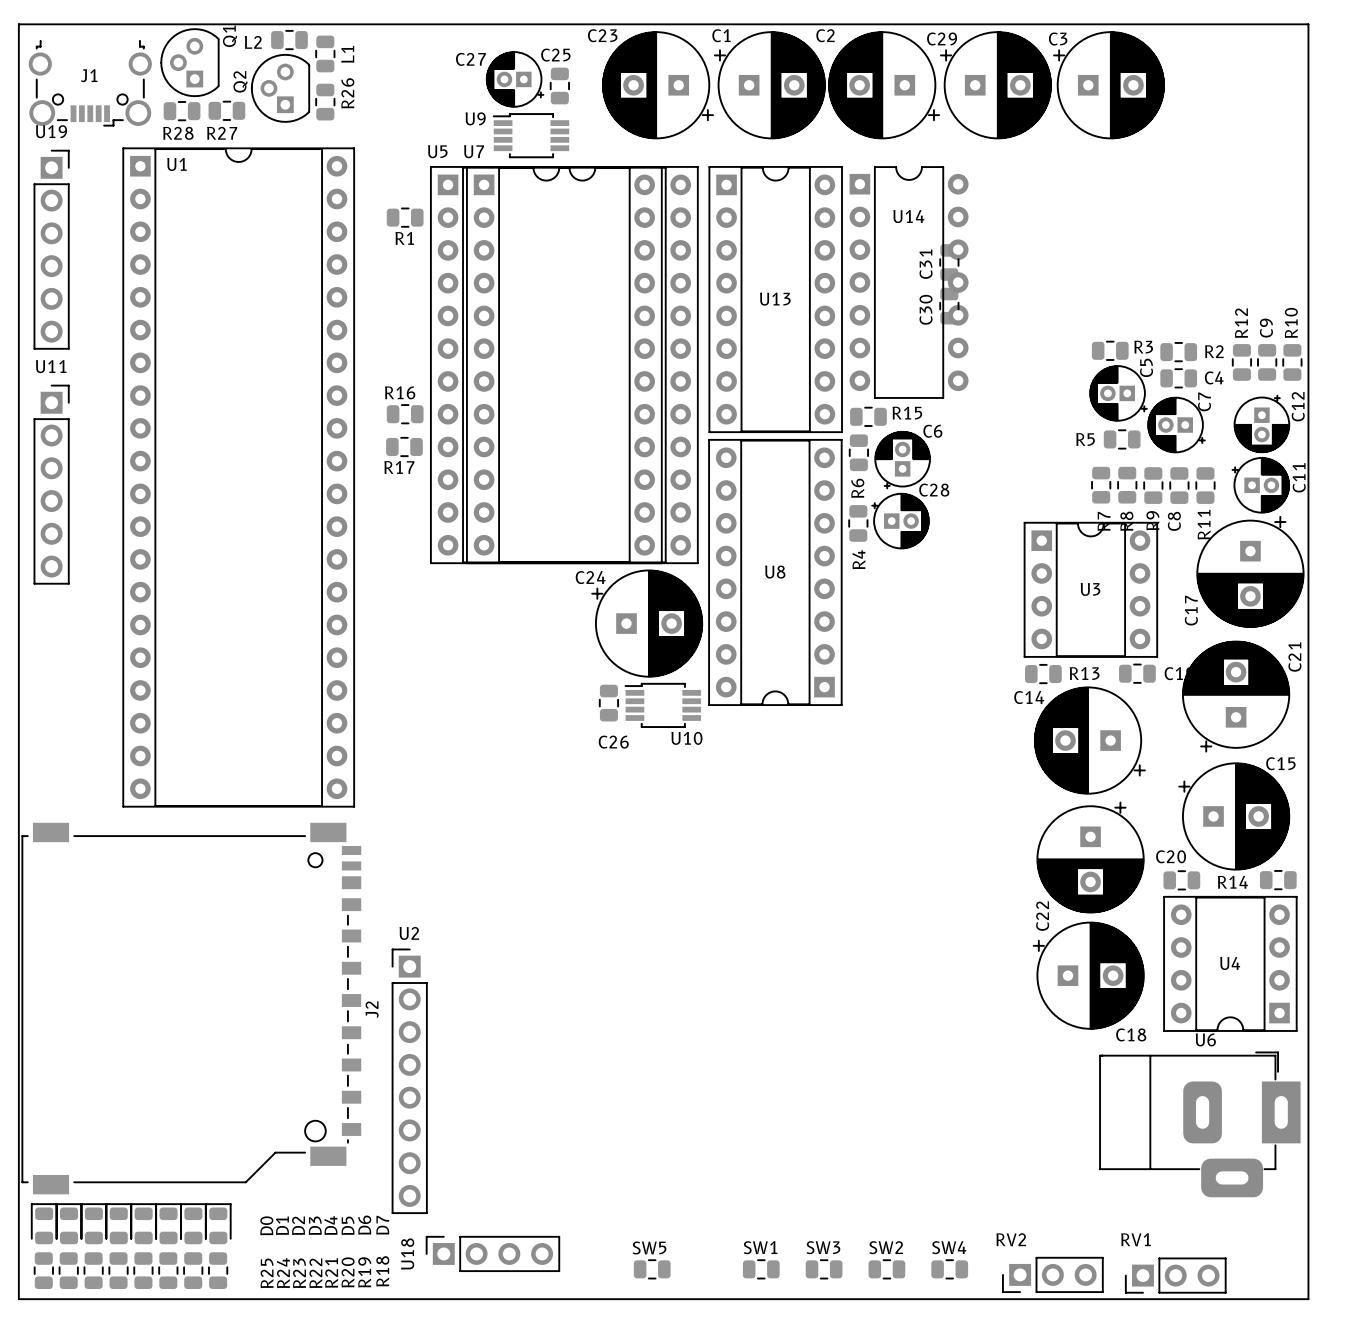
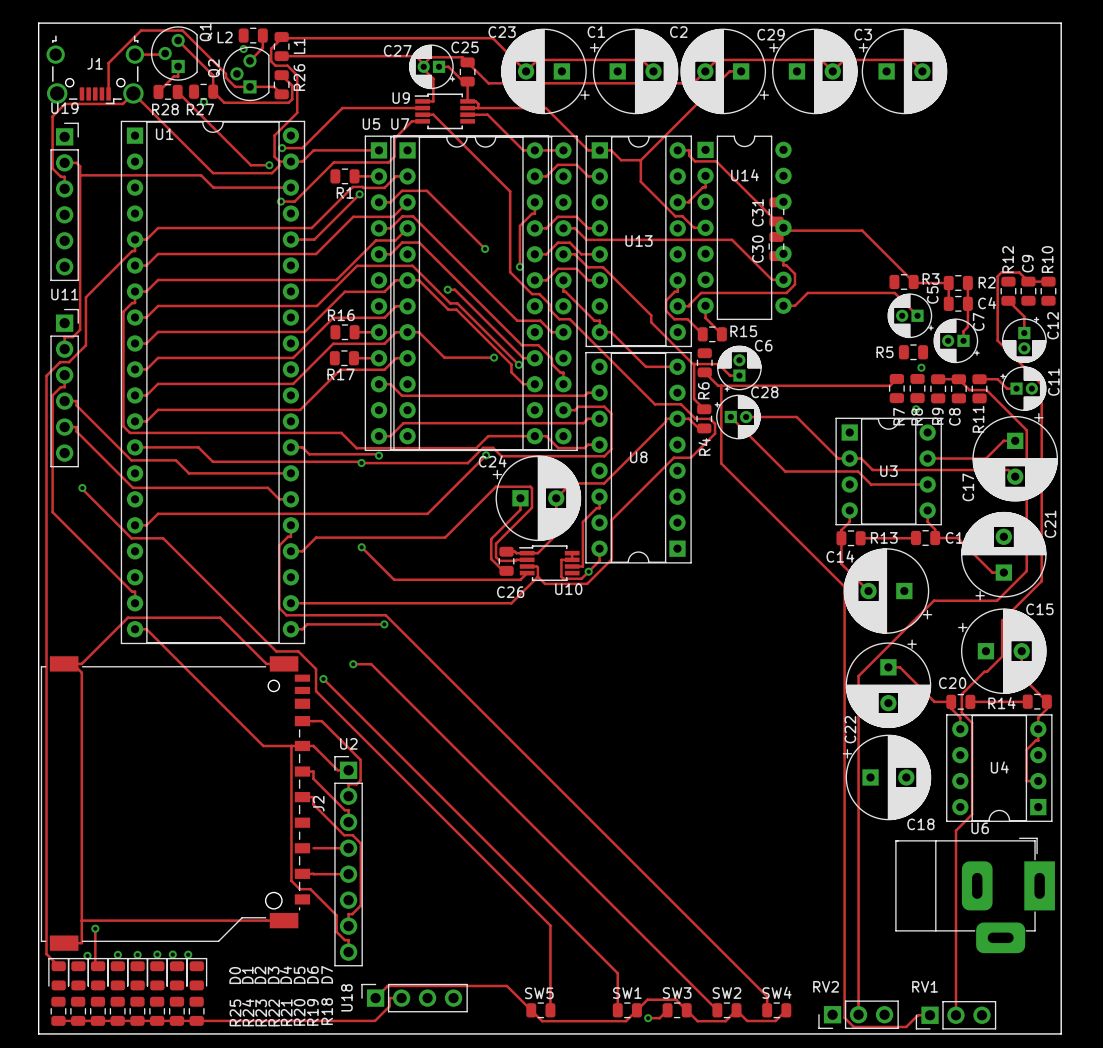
track: none -> (262, 35) (262, 48) (249, 60)
track: none -> (281, 38) (492, 38) (526, 71) (537, 59) (641, 59) (653, 71)
track: none -> (281, 38) (271, 48) (271, 61) (275, 65) (287, 65) (297, 75) (297, 112) (274, 135) (274, 156) (279, 161)
track: none -> (178, 40) (213, 75) (213, 91) (224, 102) (288, 102) (292, 99) (292, 85) (281, 75)
via: none -> (243, 49)
track: none -> (165, 53) (134, 54)
track: none -> (281, 56) (415, 56) (423, 64)
track: none -> (423, 64) (430, 57) (462, 57) (488, 83) (693, 83) (716, 59) (821, 59) (832, 71) (844, 59) (910, 59) (922, 71)
track: none -> (423, 64) (423, 69) (433, 78) (433, 101) (422, 101)
track: none -> (178, 66) (178, 76) (173, 76) (158, 91)
track: none -> (439, 66) (448, 66) (463, 81) (467, 81) (468, 101)
track: none -> (741, 71) (729, 71) (640, 160)
track: none -> (177, 91) (250, 165) (269, 165)
track: none -> (108, 93) (108, 63) (141, 30) (182, 30) (226, 73) (226, 77) (235, 86) (274, 86) (281, 94)
via: none -> (203, 101)
track: none -> (467, 101) (475, 101) (478, 108)
track: none -> (422, 108) (342, 108) (302, 148) (282, 148)
track: none -> (467, 108) (545, 108) (588, 150) (611, 150) (621, 160) (640, 160)
track: none -> (422, 114) (433, 114) (510, 191) (510, 272) (532, 294) (539, 294) (550, 305) (550, 310) (559, 319) (569, 319) (654, 404) (681, 404) (695, 418) (710, 418) (715, 423) (715, 433) (690, 457) (673, 457) (611, 519) (611, 559) (587, 583) (544, 583) (537, 576)
track: none -> (467, 114) (487, 114) (523, 150) (563, 150)
track: none -> (422, 121) (411, 121) (394, 138) (394, 156) (388, 162) (333, 162) (294, 201) (281, 201)
via: none -> (282, 148)
track: none -> (378, 150) (313, 150) (302, 161) (279, 161)
track: none -> (677, 150) (689, 150) (689, 155) (695, 161) (716, 161) (782, 227)
track: none -> (640, 160) (640, 181) (675, 216) (682, 216) (694, 227) (705, 227)
track: none -> (279, 161) (279, 165) (271, 173) (213, 173) (133, 93) (122, 103) (65, 103) (52, 116) (52, 168) (60, 176) (64, 176) (64, 188)
track: none -> (64, 162) (76, 162) (80, 166) (80, 329) (72, 337) (64, 337) (64, 349)
via: none -> (269, 165)
track: none -> (80, 175) (201, 175) (213, 187) (290, 187)
track: none -> (705, 175) (705, 187) (702, 187) (689, 202) (677, 202)
track: none -> (354, 176) (378, 176)
track: none -> (407, 176) (396, 176) (384, 187) (352, 186) (311, 228) (158, 228) (146, 239) (135, 239) (135, 251) (132, 251) (85, 297) (85, 345) (69, 362) (60, 362) (46, 375) (46, 954) (58, 966)
track: none -> (534, 176) (546, 176) (557, 164) (576, 164) (588, 176) (599, 176)
track: none -> (359, 194) (314, 239) (290, 239)
via: none -> (359, 194)
via: none -> (281, 201)
track: none -> (378, 202) (390, 202) (402, 190) (426, 190) (485, 248)
track: none -> (407, 202) (393, 216) (353, 216) (316, 254) (158, 254) (146, 265) (135, 265)
track: none -> (534, 202) (534, 213) (531, 213) (519, 225) (519, 266)
track: none -> (378, 228) (390, 228) (402, 216) (413, 216) (517, 320) (540, 320) (551, 332) (563, 332)
track: none -> (407, 228) (395, 240) (375, 240) (336, 280) (158, 280) (146, 291) (135, 291) (135, 303) (132, 303) (123, 311) (123, 426) (130, 432) (341, 432) (356, 448) (476, 448) (488, 436) (546, 436) (558, 448) (584, 448) (588, 444) (599, 444)
track: none -> (534, 228) (546, 228) (557, 216) (576, 216) (588, 228) (599, 228)
track: none -> (563, 228) (574, 228) (586, 239) (732, 239) (771, 279) (783, 279)
track: none -> (782, 230) (862, 230) (914, 283) (948, 283) (948, 303)
via: none -> (485, 248)
track: none -> (378, 254) (390, 254) (402, 242) (419, 242) (521, 345) (538, 345) (551, 358) (551, 364) (560, 372) (563, 372) (563, 384)
track: none -> (534, 254) (546, 254) (557, 242) (569, 242) (581, 254) (599, 254)
track: none -> (563, 254) (574, 254) (587, 267) (603, 267) (651, 315) (651, 322) (693, 364) (718, 364) (729, 375) (739, 375)
track: none -> (776, 256) (783, 253) (783, 265) (786, 265) (794, 273) (794, 284) (786, 292) (701, 292) (689, 306) (677, 306)
via: none -> (519, 266)
track: none -> (534, 280) (546, 280) (557, 268) (576, 268) (588, 280) (599, 280)
track: none -> (563, 280) (563, 291) (594, 320) (599, 320) (599, 332) (611, 332) (645, 366) (677, 366)
track: none -> (677, 280) (677, 291) (674, 291) (666, 300) (666, 310) (674, 319) (687, 319) (702, 334)
track: none -> (1048, 281) (1028, 281) (1019, 272) (1001, 272) (997, 276) (997, 340) (1041, 384) (1041, 581) (1002, 620) (1002, 656) (961, 694) (961, 712) (972, 722) (972, 814) (955, 830) (955, 1015)
track: none -> (967, 283) (967, 326) (963, 331) (963, 340)
track: none -> (447, 289) (454, 289) (523, 358) (534, 358)
via: none -> (447, 289)
track: none -> (1008, 300) (1024, 316) (1024, 333)
track: none -> (705, 305) (705, 317) (721, 334)
track: none -> (783, 305) (794, 305) (807, 292) (894, 292) (917, 315)
track: none -> (407, 306) (396, 306) (384, 317) (333, 317) (293, 357) (158, 357) (146, 369) (135, 369)
track: none -> (135, 317) (146, 317) (158, 305) (316, 305) (357, 265) (412, 265) (450, 303) (457, 303) (518, 364)
track: none -> (354, 332) (378, 332)
track: none -> (135, 343) (146, 343) (158, 331) (304, 331) (344, 291) (384, 291) (396, 280) (419, 280) (448, 309) (456, 309) (511, 364) (511, 372) (523, 384) (534, 384)
track: none -> (353, 358) (378, 358)
track: none -> (407, 358) (396, 358) (384, 369) (340, 369) (300, 409) (158, 409) (146, 421) (135, 421)
track: none -> (494, 357) (444, 357) (419, 332) (396, 332) (384, 343) (333, 343) (293, 383) (158, 383) (146, 395) (135, 395)
via: none -> (494, 357)
track: none -> (694, 364) (694, 399) (704, 409)
via: none -> (518, 364)
via: none -> (921, 367)
track: none -> (704, 372) (718, 385) (890, 385) (896, 378)
track: none -> (64, 375) (64, 387) (60, 387) (52, 395) (52, 512) (132, 591) (135, 591) (135, 603)
track: none -> (938, 379) (958, 379) (969, 390) (986, 390) (1026, 430) (1026, 571) (997, 600) (933, 600) (858, 676) (858, 1014)
track: none -> (979, 379) (997, 379) (1007, 388) (1016, 388)
track: none -> (378, 384) (390, 384) (402, 395) (585, 395) (588, 392) (599, 392)
track: none -> (721, 385) (721, 463) (844, 586) (844, 1017) (853, 1026) (906, 1026) (917, 1015) (930, 1015)
track: none -> (64, 401) (76, 401) (76, 405) (131, 460) (175, 460) (188, 473) (290, 473)
via: none -> (916, 409)
track: none -> (563, 410) (574, 410) (578, 406) (604, 406) (611, 413) (611, 449) (604, 456) (501, 456) (493, 447) (483, 447) (467, 463) (361, 463) (212, 461) (198, 447) (135, 447)
track: none -> (730, 417) (785, 471) (858, 471) (871, 484) (927, 484)
track: none -> (746, 417) (796, 417) (838, 458) (861, 458) (872, 470) (1008, 470) (1015, 476)
track: none -> (599, 418) (588, 418) (583, 423) (403, 423) (390, 436) (378, 436)
track: none -> (64, 427) (76, 427) (76, 431) (132, 487) (267, 487) (279, 499) (290, 499)
track: none -> (704, 428) (698, 428) (688, 418) (665, 418) (665, 421) (604, 483) (571, 483) (556, 498) (556, 534) (537, 553) (506, 551)
track: none -> (1015, 440) (1003, 440) (986, 458) (927, 458)
track: none -> (290, 447) (302, 447) (309, 454) (378, 455)
via: none -> (378, 455)
track: none -> (486, 455) (427, 513) (158, 513) (146, 525) (135, 525)
via: none -> (486, 455)
via: none -> (361, 462)
track: none -> (82, 488) (131, 538) (163, 538) (276, 651) (298, 651) (316, 669) (316, 691) (550, 925) (550, 1010)
via: none -> (82, 488)
track: none -> (599, 496) (599, 508) (596, 508) (582, 521) (582, 566) (572, 566)
track: none -> (520, 498) (520, 509) (491, 538) (491, 559) (503, 570) (506, 570)
track: none -> (849, 510) (849, 521) (841, 530) (841, 563) (868, 591)
track: none -> (927, 510) (927, 521) (935, 529) (935, 538) (957, 538) (992, 572) (1003, 572)
track: none -> (290, 525) (290, 536) (288, 536) (279, 545) (279, 608) (286, 615) (385, 615) (767, 996) (767, 1010)
track: none -> (916, 538) (860, 538)
track: none -> (361, 547) (394, 579) (520, 579) (527, 573)
via: none -> (361, 547)
track: none -> (599, 548) (599, 560) (581, 578) (563, 578) (561, 576) (561, 559) (572, 559) (572, 553)
track: none -> (290, 551) (302, 551) (316, 537) (445, 537) (496, 486) (530, 486) (531, 507) (496, 543) (496, 557) (499, 560) (527, 559)
track: none -> (527, 566) (536, 566) (537, 576)
via: none -> (588, 571)
track: none -> (537, 576) (511, 603) (290, 603)
track: none -> (384, 624) (307, 624) (302, 629) (290, 629)
via: none -> (384, 624)
track: none -> (135, 629) (146, 629) (263, 745) (313, 745) (337, 770) (348, 770)
track: none -> (1021, 651) (1021, 676) (1046, 701) (1046, 709) (1038, 717) (1038, 740) (1035, 740) (1026, 749) (1026, 781) (1038, 781)
track: none -> (64, 663) (81, 663) (127, 617) (220, 617) (266, 663) (284, 663)
track: none -> (72, 663) (81, 672) (81, 943) (64, 943)
track: none -> (353, 664) (371, 664) (717, 1010)
via: none -> (353, 664)
track: none -> (888, 667) (899, 667) (934, 701) (951, 701) (951, 708) (960, 717) (960, 729)
track: none -> (323, 678) (617, 973) (617, 1010)
via: none -> (323, 678)
track: none -> (1027, 701) (970, 701)
track: none -> (302, 721) (321, 721) (360, 759) (360, 780) (356, 784) (348, 784) (348, 796)
track: none -> (291, 745) (291, 880) (299, 889) (310, 889) (336, 915) (336, 931) (344, 940) (348, 940) (348, 952)
track: none -> (302, 771) (313, 771) (313, 778) (344, 810) (348, 810) (348, 822)
track: none -> (302, 797) (313, 797) (313, 804) (344, 835) (352, 835) (360, 843) (360, 905) (352, 914) (348, 914) (348, 926)
track: none -> (313, 848) (348, 848)
track: none -> (302, 873) (348, 874)
track: none -> (81, 920) (284, 920)
track: none -> (95, 928) (95, 963) (98, 966)
via: none -> (95, 928)
via: none -> (117, 954)
via: none -> (137, 954)
via: none -> (157, 954)
via: none -> (172, 954)
via: none -> (188, 954)
via: none -> (87, 955)
track: none -> (375, 998) (387, 985) (506, 985) (542, 1021) (626, 1021) (647, 999) (676, 999) (697, 1021) (725, 1021) (736, 1010) (747, 1021) (775, 1021) (786, 1010)
track: none -> (401, 998) (389, 998) (389, 1006) (375, 1020) (58, 1020)
track: none -> (667, 1010) (659, 1018) (648, 1018)
via: none -> (648, 1018)

